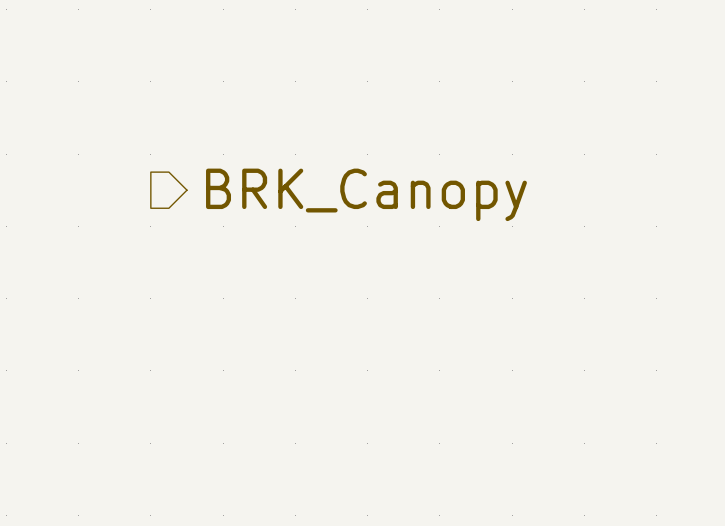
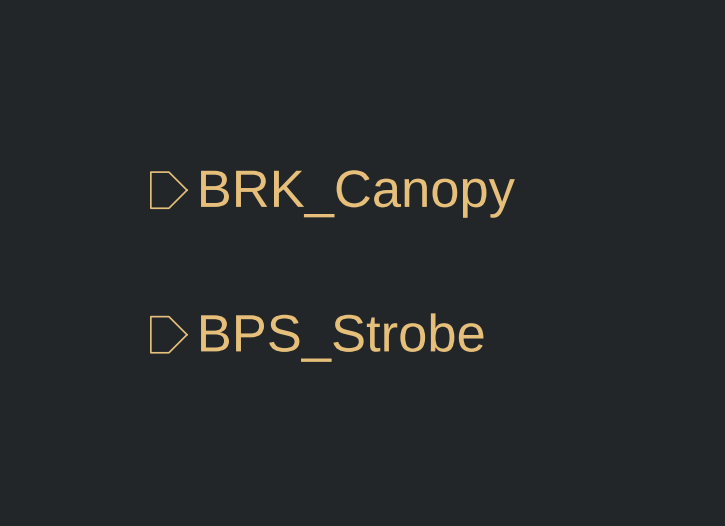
hierarchical label: none -> BPS_Strobe (342, 337)

